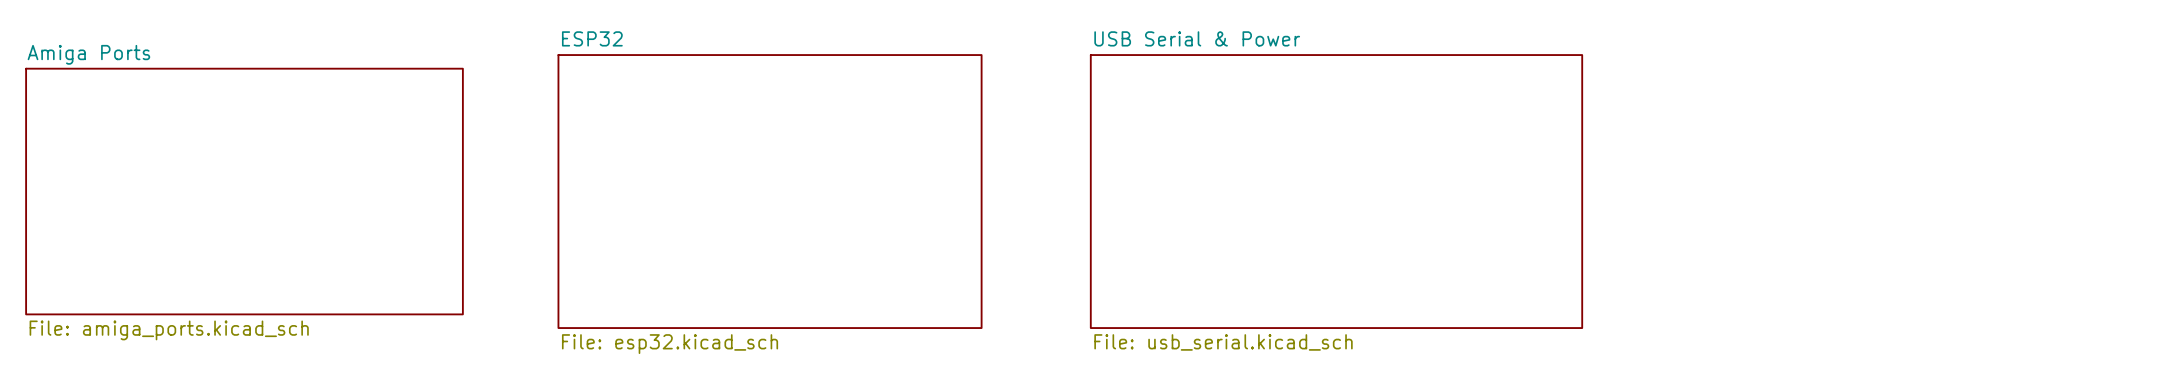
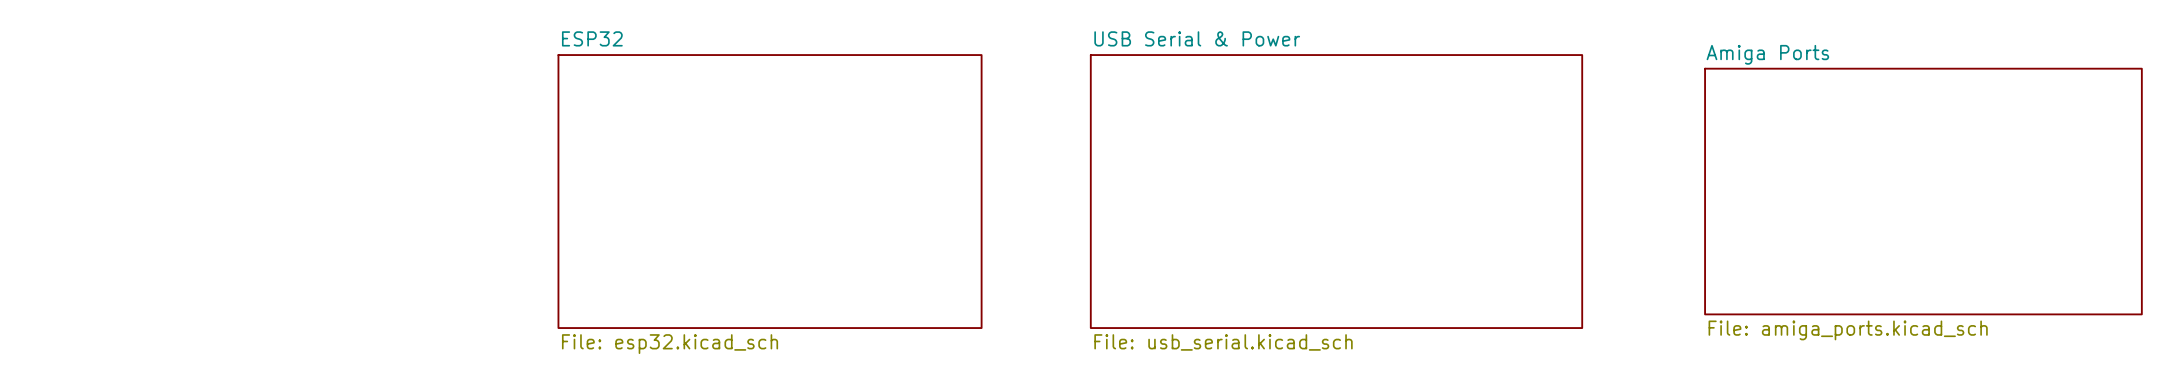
sheet Amiga Ports: File: amiga_ports.kicad_sch (244, 191) -> none
sheet Amiga Ports: none -> File: amiga_ports.kicad_sch (1923, 191)

